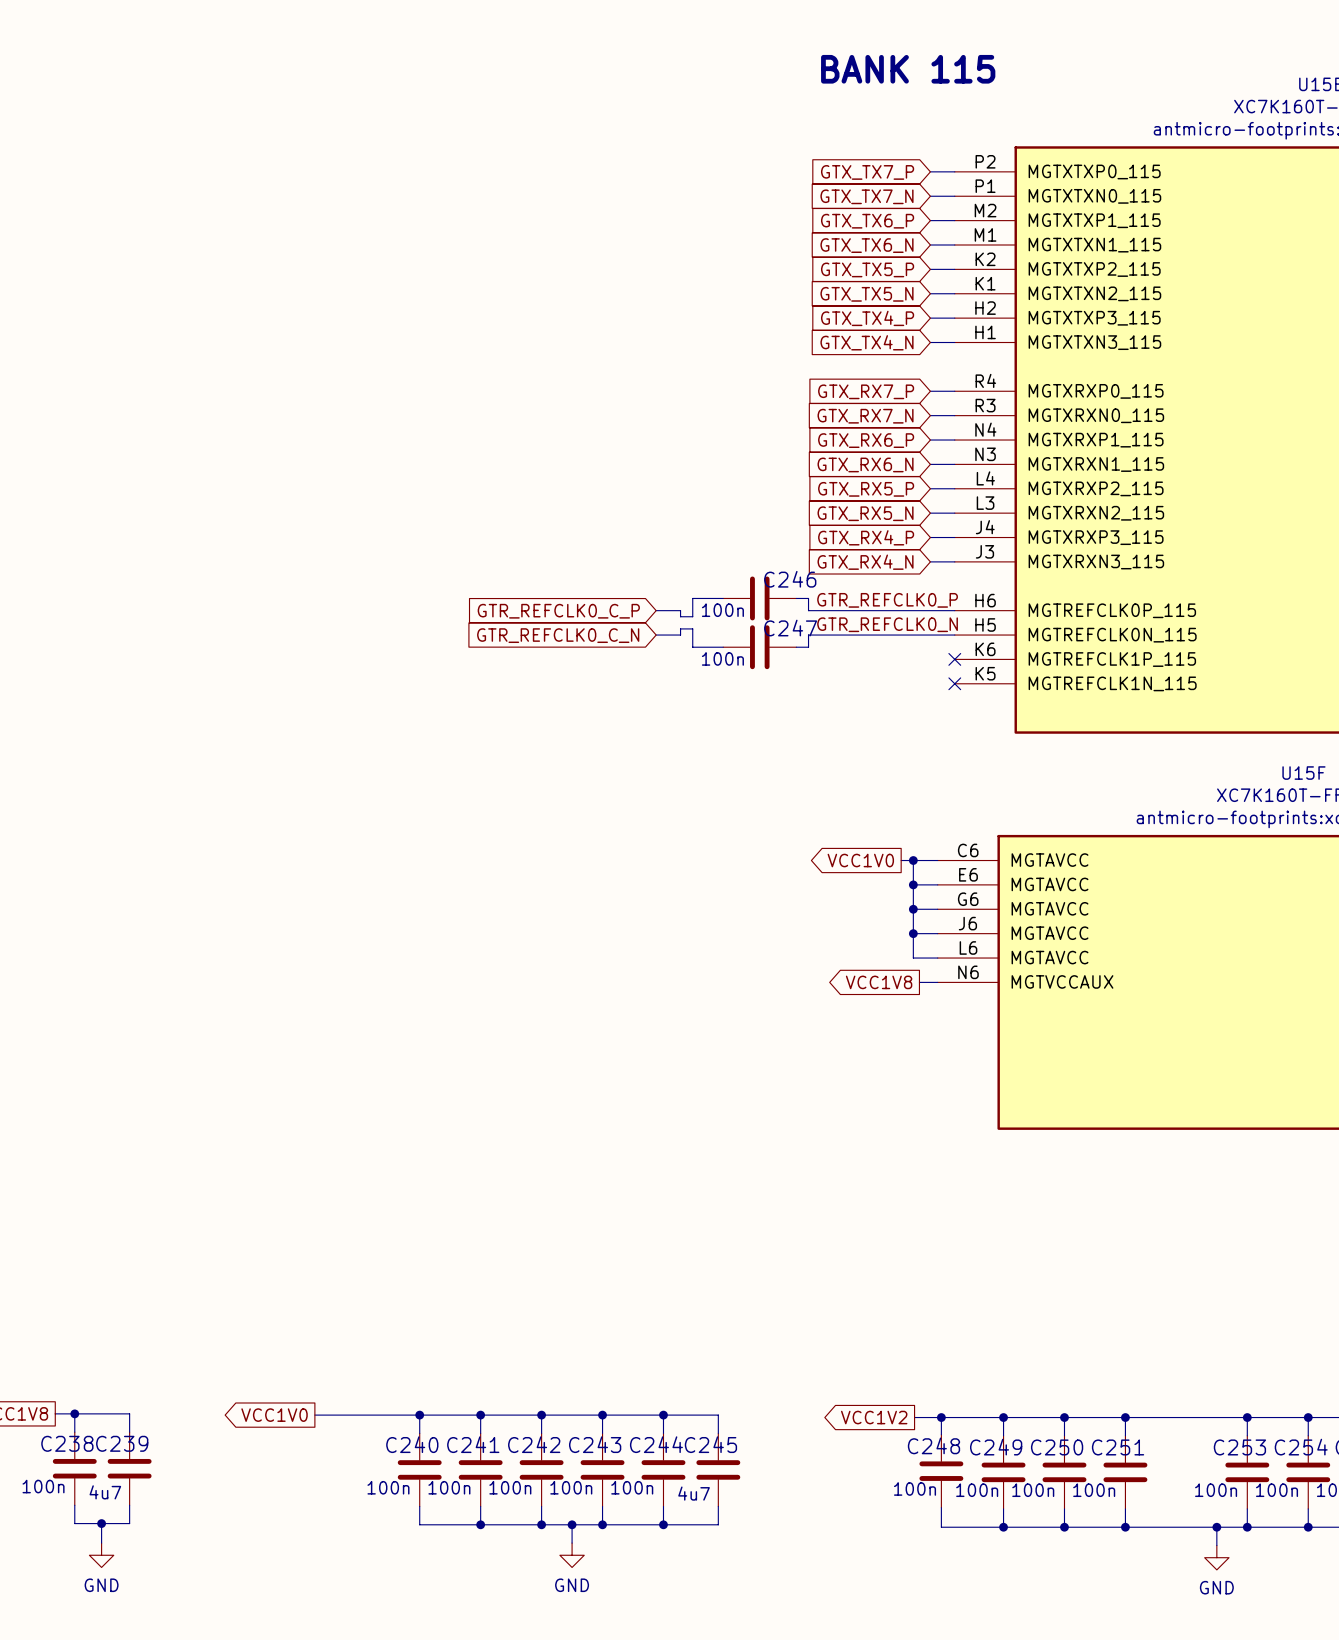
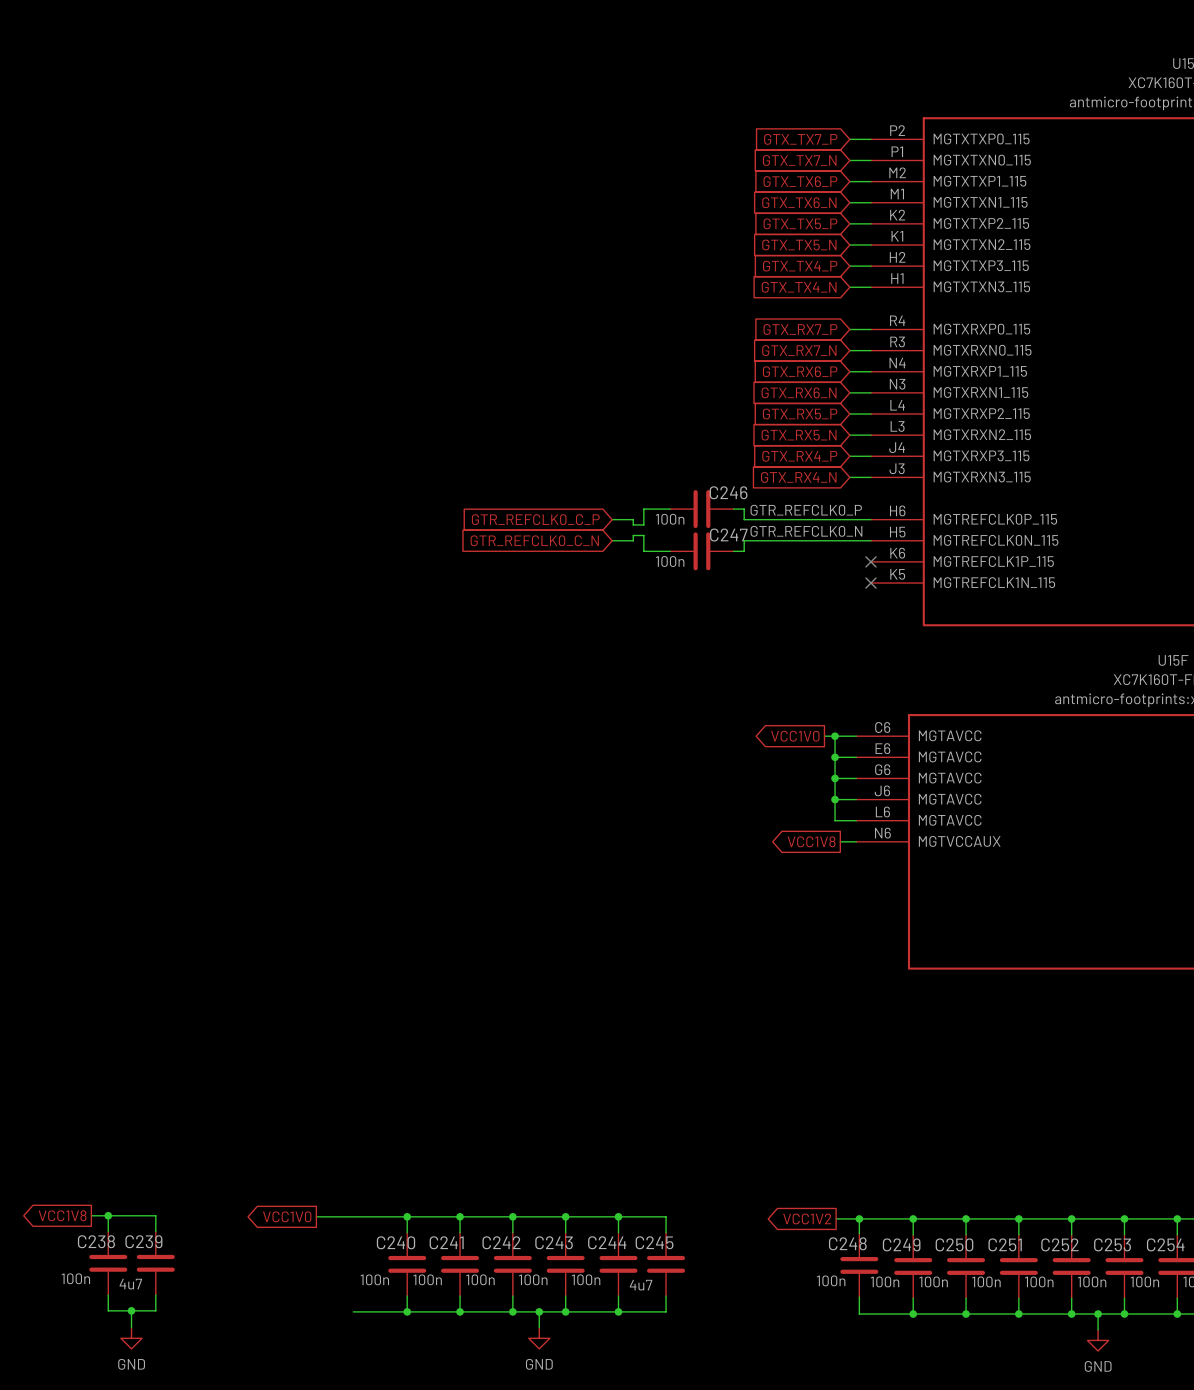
text: BANK 115 (908, 69) -> none
wire: none -> (1071, 1218) (1071, 1234)
junction: none -> (1071, 1218)
C252: none -> (1071, 1266)
wire: none -> (1071, 1298) (1071, 1314)
wire: none -> (353, 1311) (407, 1311)
junction: none -> (407, 1311)
junction: none -> (1071, 1314)

